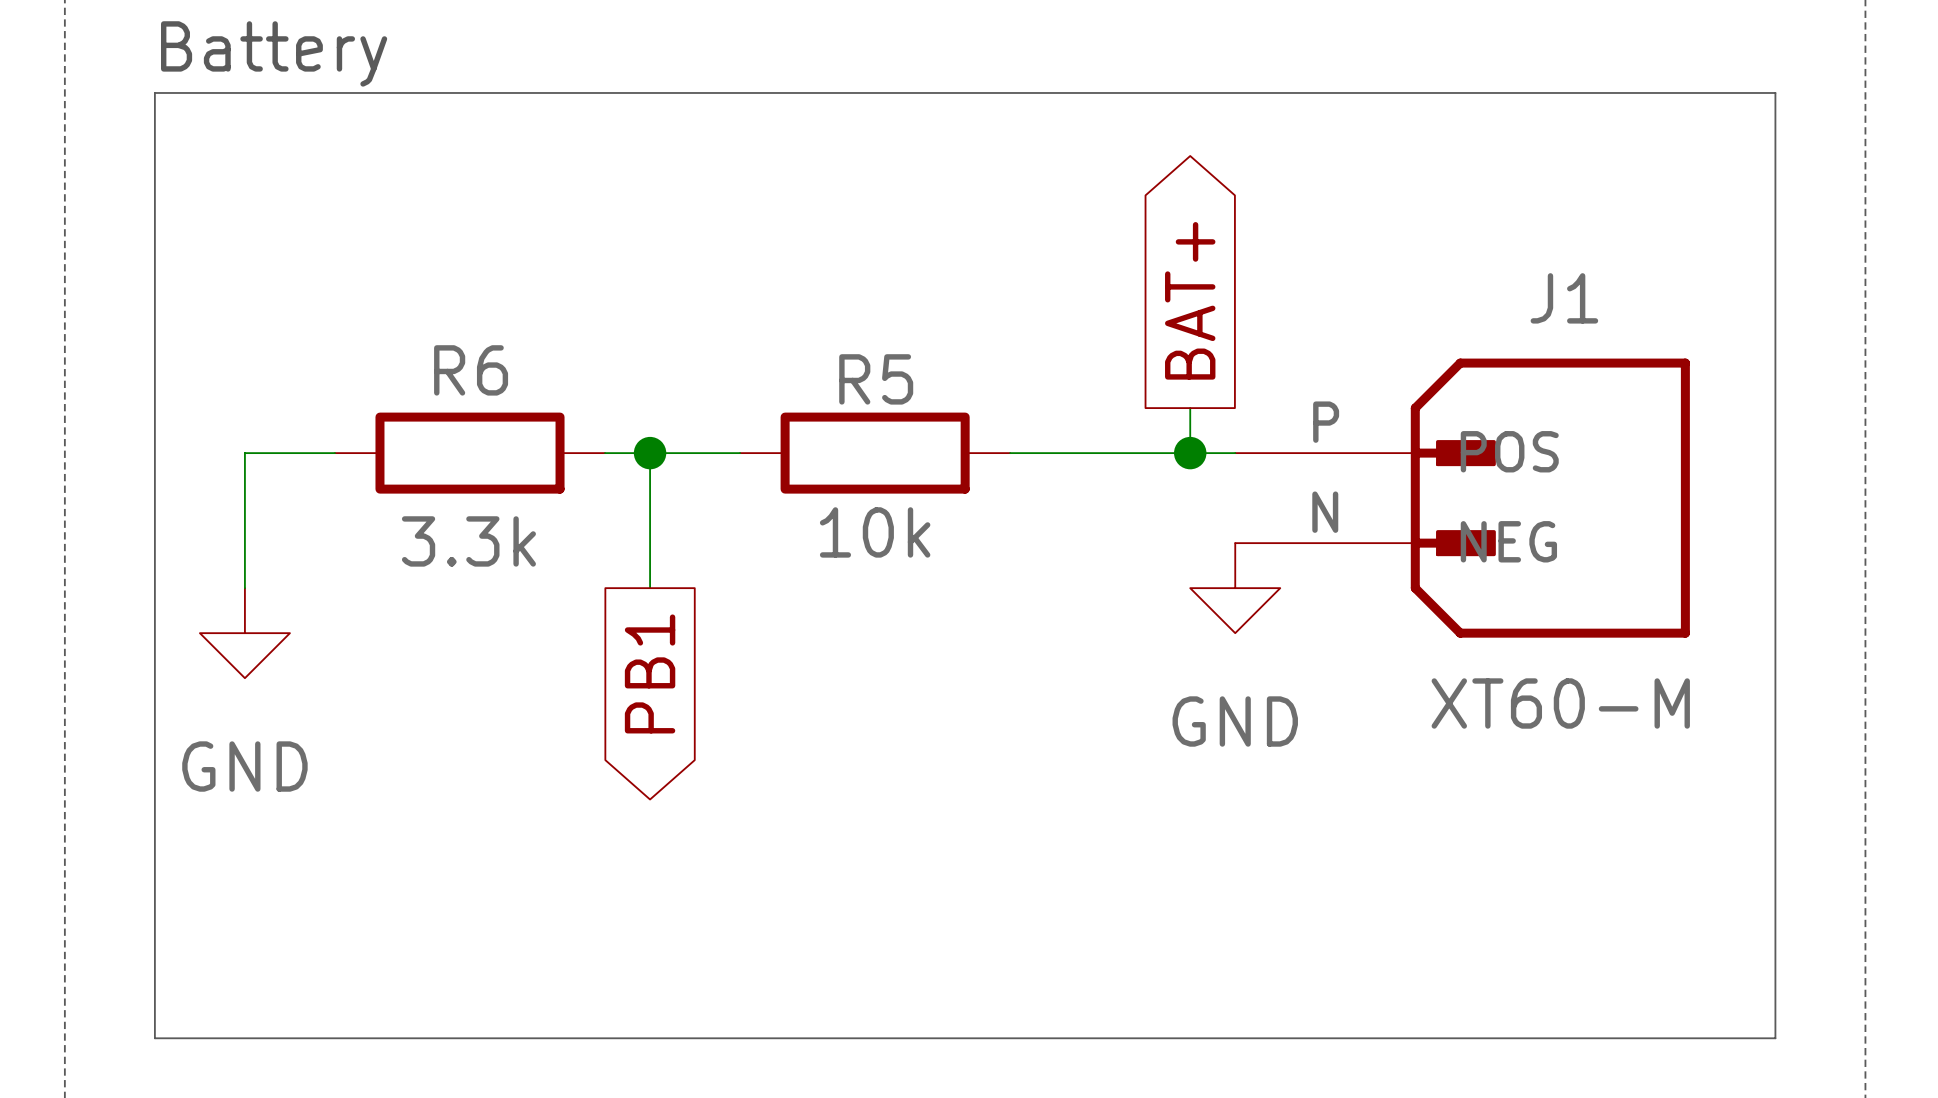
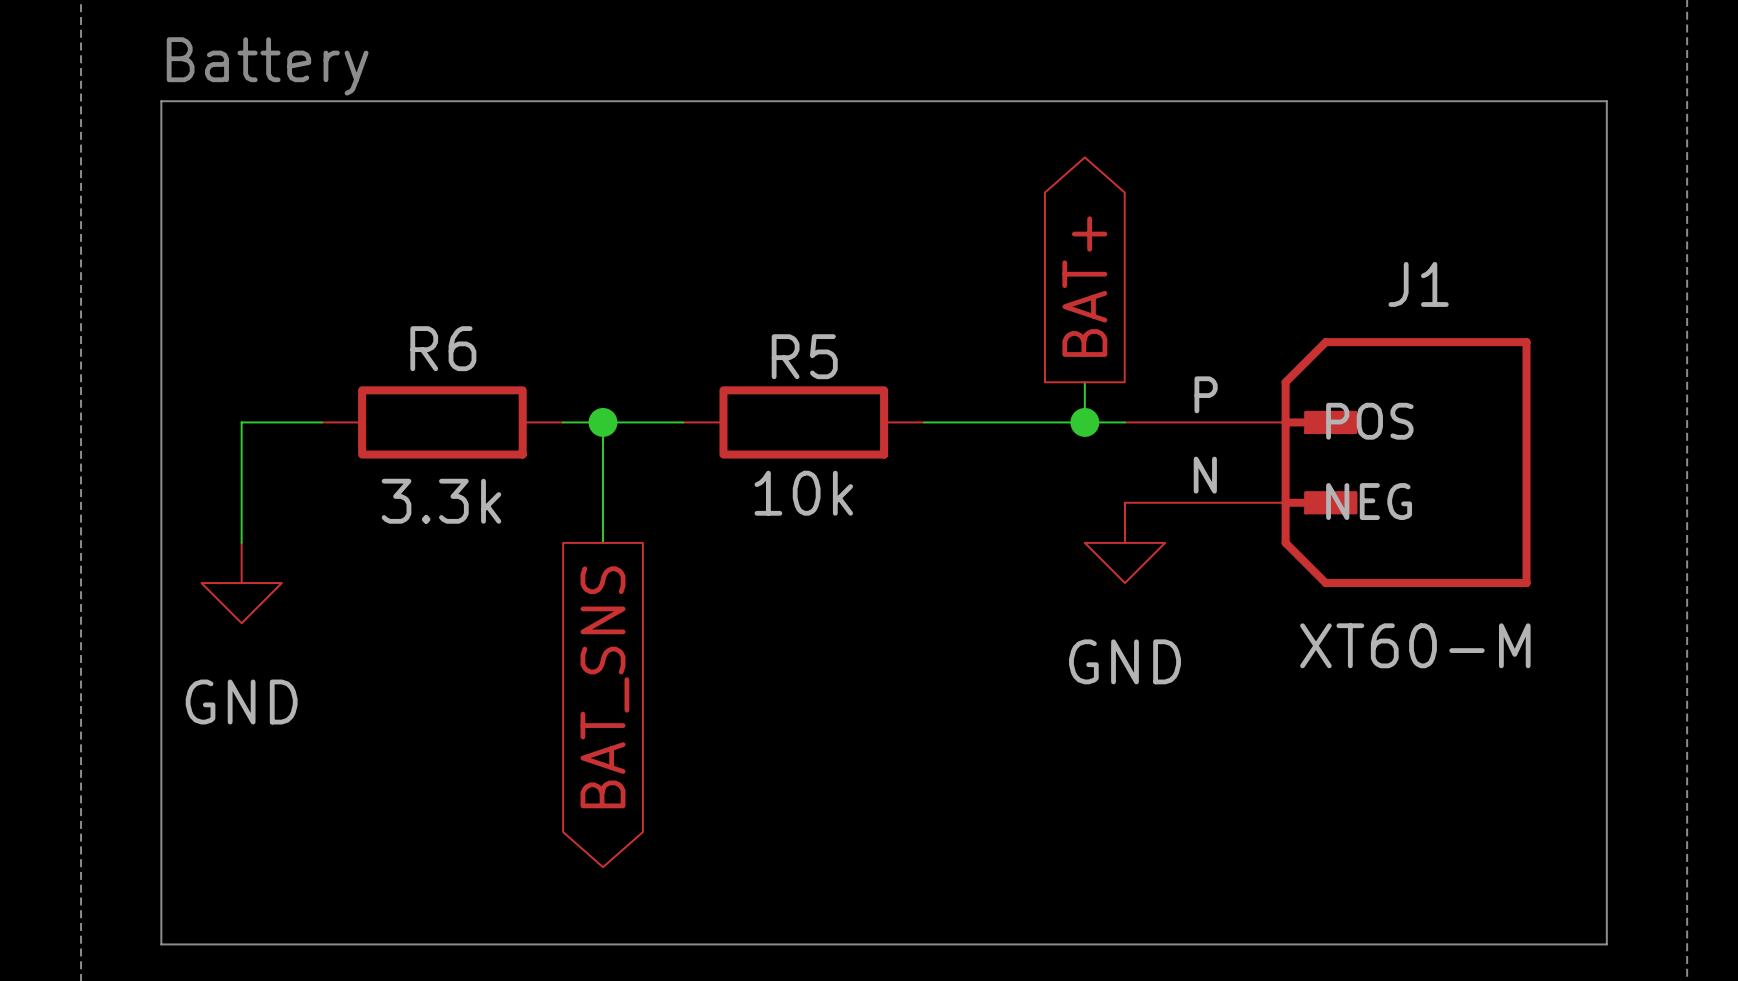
global label: PB1 (650, 673) -> BAT_SNS (604, 687)

